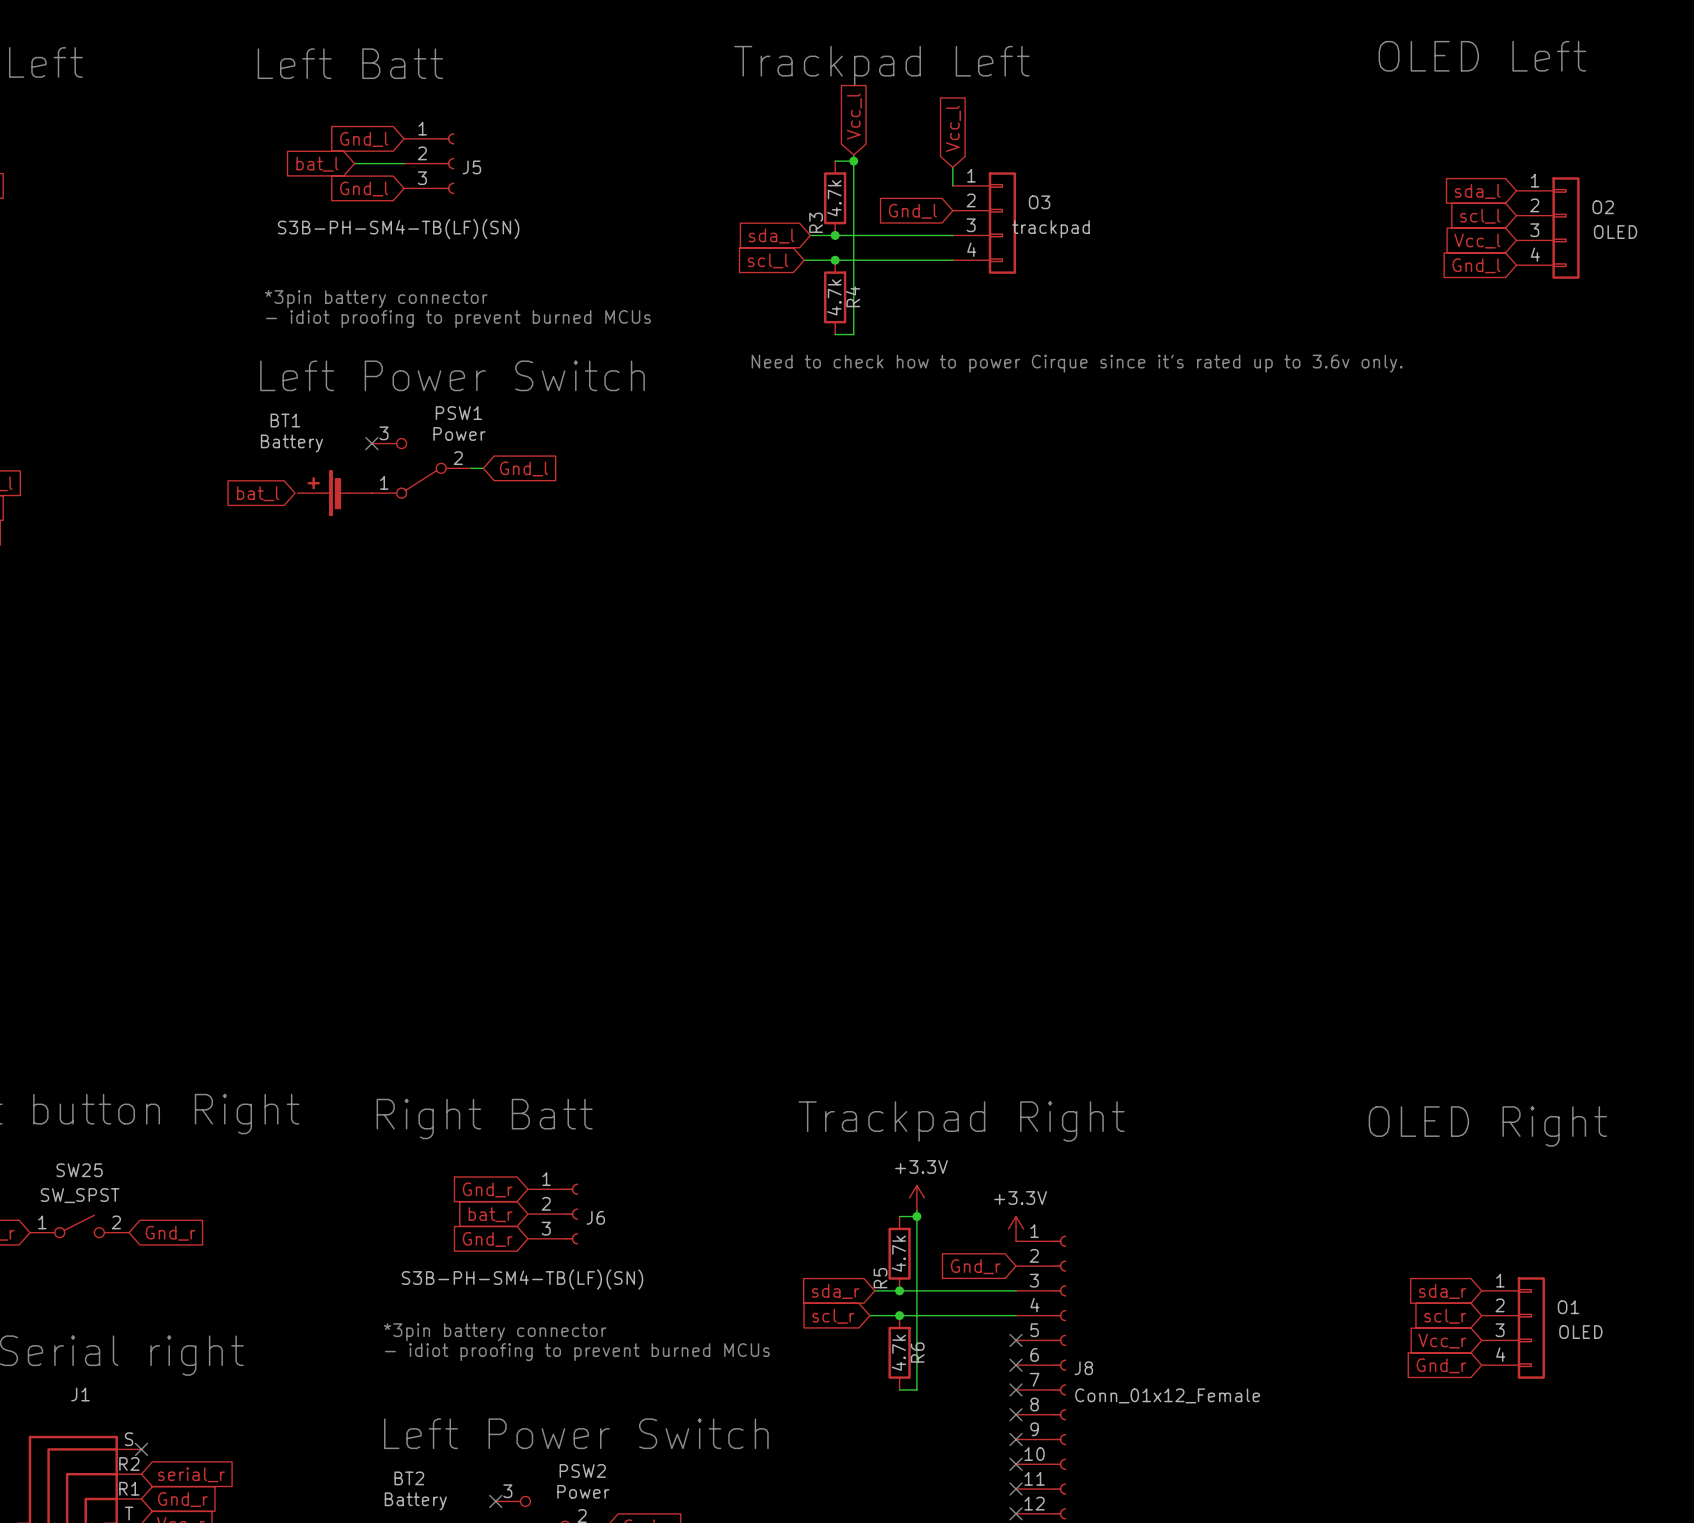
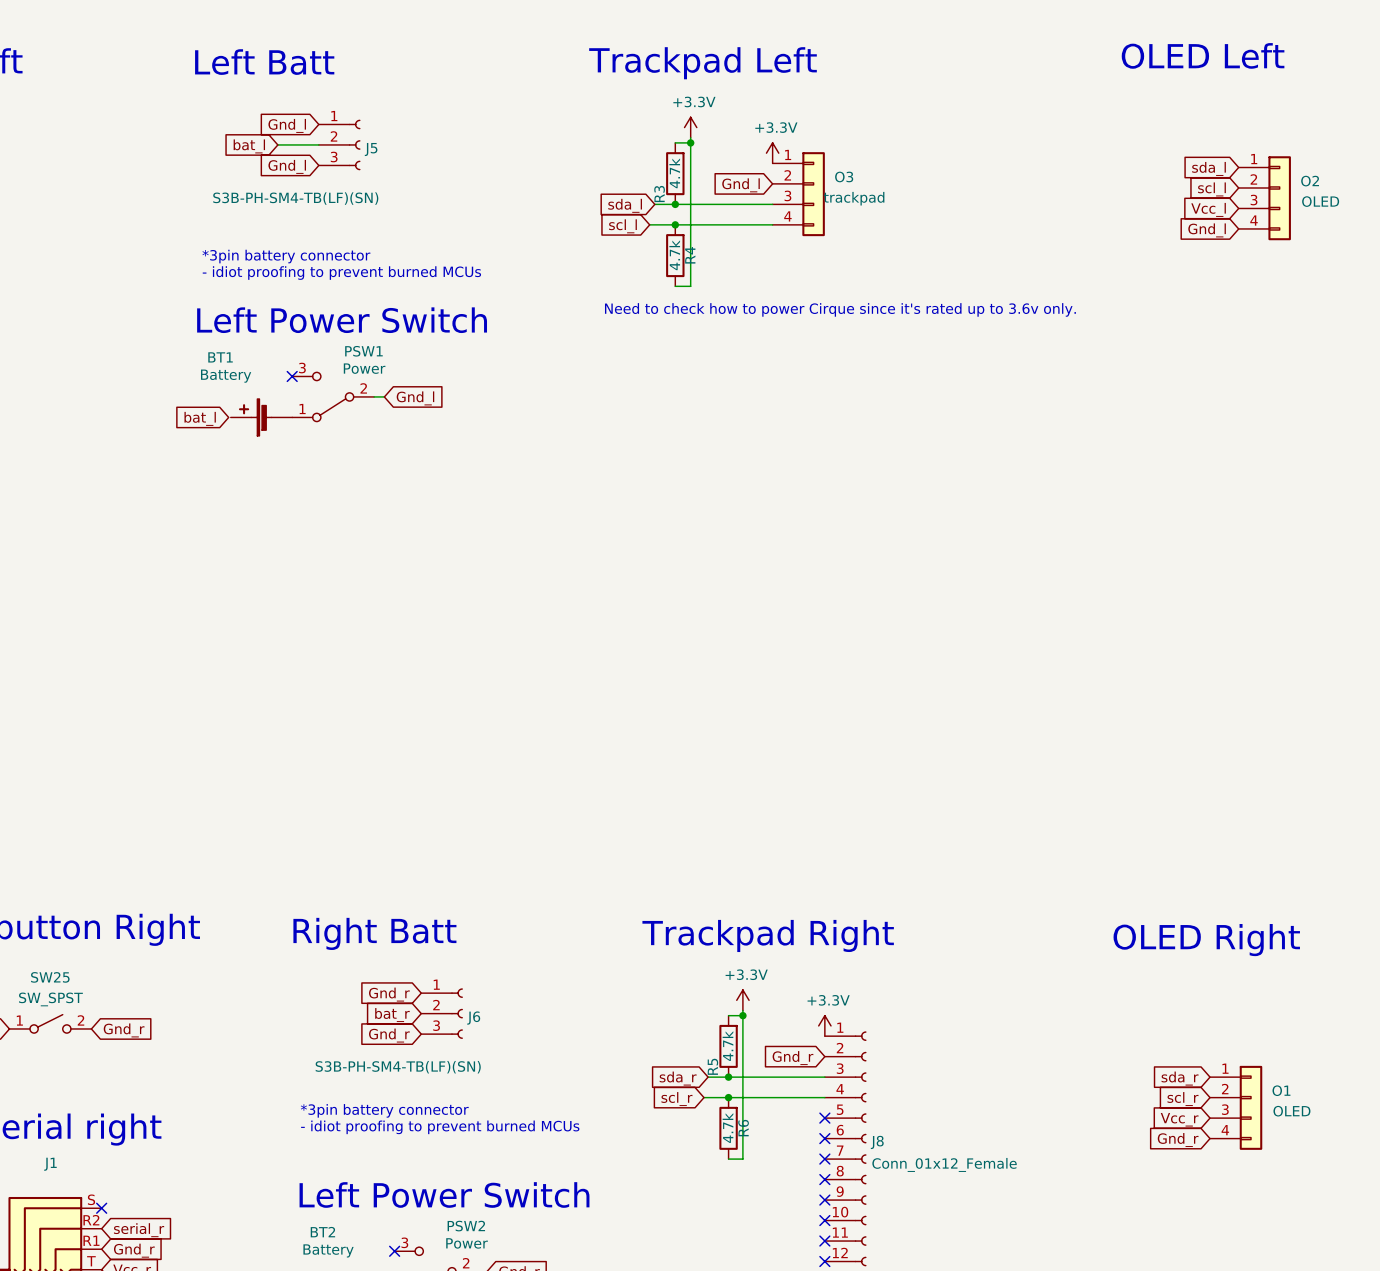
global label: Vcc_l (854, 116) -> none
global label: Vcc_l (953, 128) -> none
power symbol: none -> +3.3V (690, 127)
power symbol: none -> +3.3V (772, 153)

